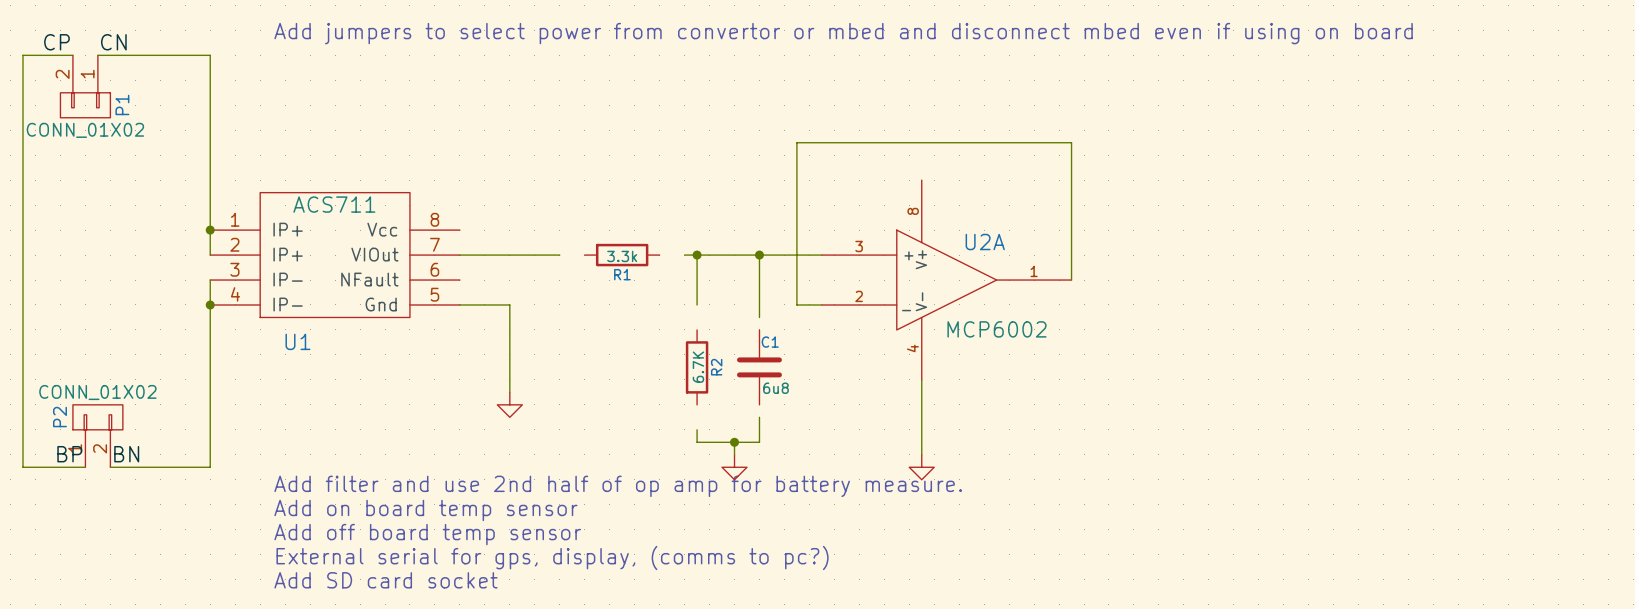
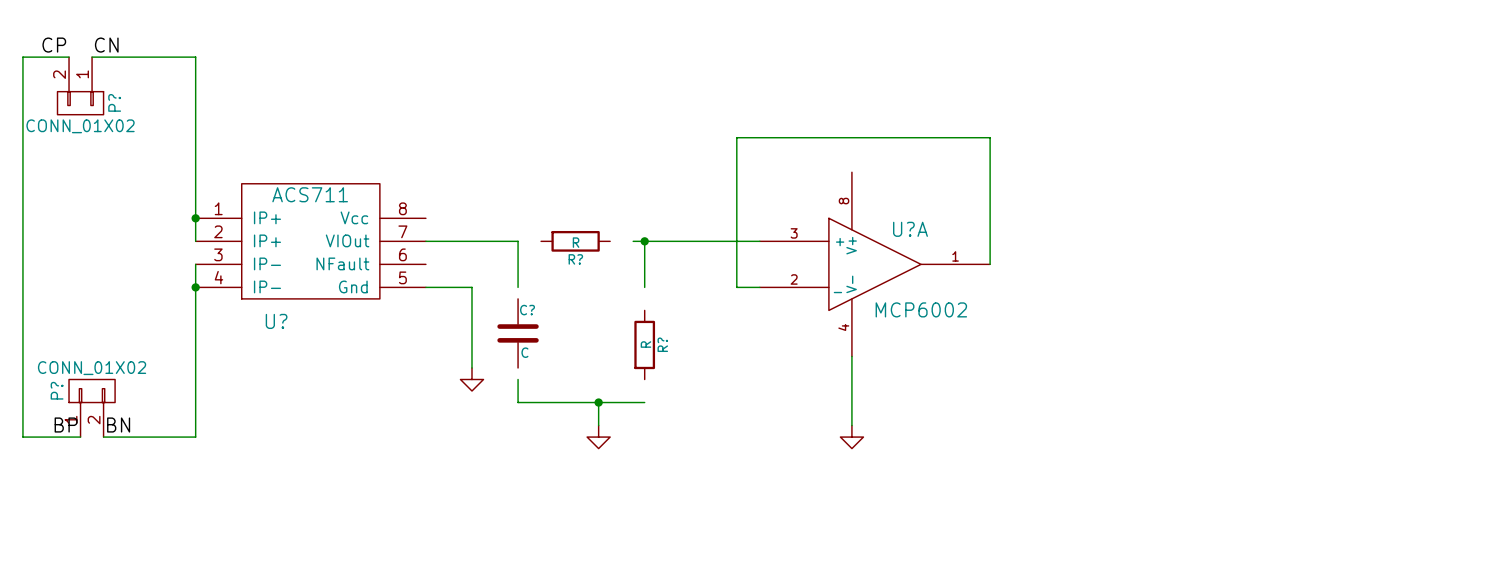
text: Add jumpers to select power from convertor or mbed and disconnect mbed even if using on board (843, 33) -> none
P1 name: P1 (122, 104) -> P? (114, 102)
U2A name: U2A (985, 242) -> U?A (910, 229)
wire: none -> (518, 241) (518, 287)
wire: (759, 255) (759, 317) -> none
junction: (759, 255) -> none
R1 value: 3.3k (622, 256) -> R (576, 242)
R1 name: R1 (622, 274) -> R? (575, 259)
U1 name: U1 (297, 341) -> U? (276, 321)
C?: none -> C (518, 333)
R2 value: 6.7K (698, 367) -> R (645, 344)
R2 name: R2 (716, 367) -> R? (662, 344)
C1: 6u8 (759, 367) -> none
P2 name: P2 (59, 417) -> P? (57, 390)
wire: (759, 417) (759, 442) (697, 442) (697, 429) -> (518, 379) (518, 402) (644, 402)
wire: none -> (598, 402) (598, 425)
junction: none -> (598, 402)
wire: (734, 442) (734, 454) -> none
junction: (734, 442) -> none
power symbol position: (734, 467) -> (598, 437)
text: Add filter and use 2nd half of op amp for battery measure. (618, 486) -> none
text: Add on board temp sensor (425, 510) -> none
text: Add off board temp sensor (427, 534) -> none
text: External serial for gps, display, (comms to pc?) (552, 557) -> none
text: Add SD card socket (385, 580) -> none

